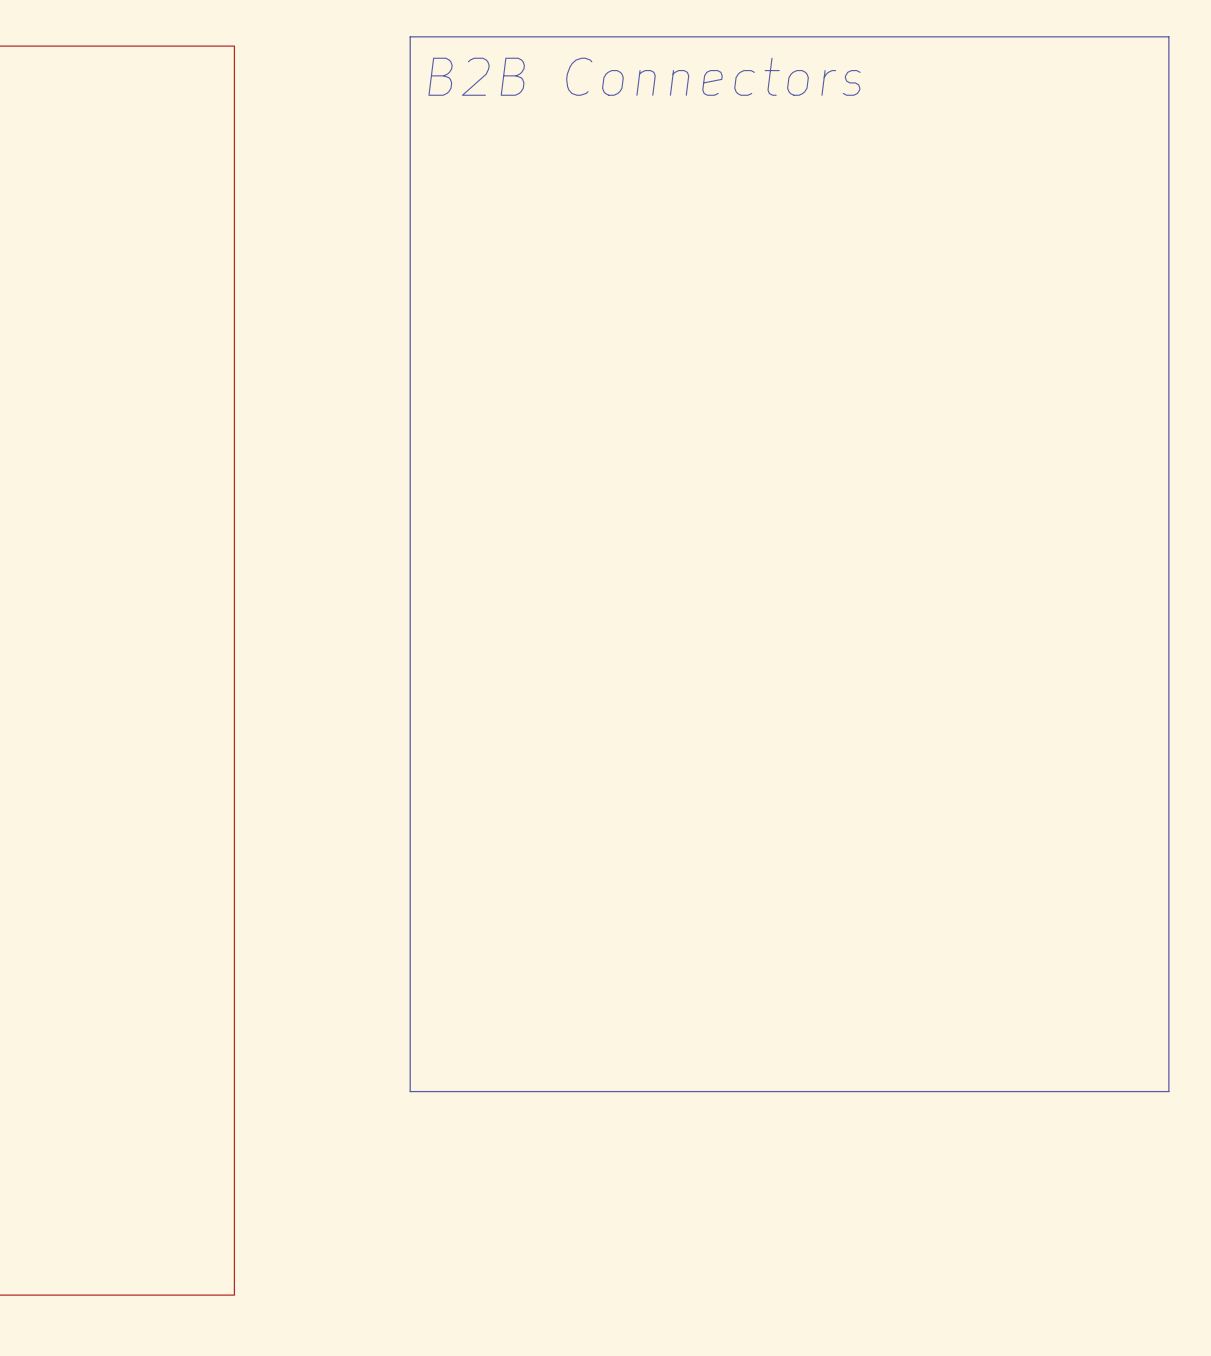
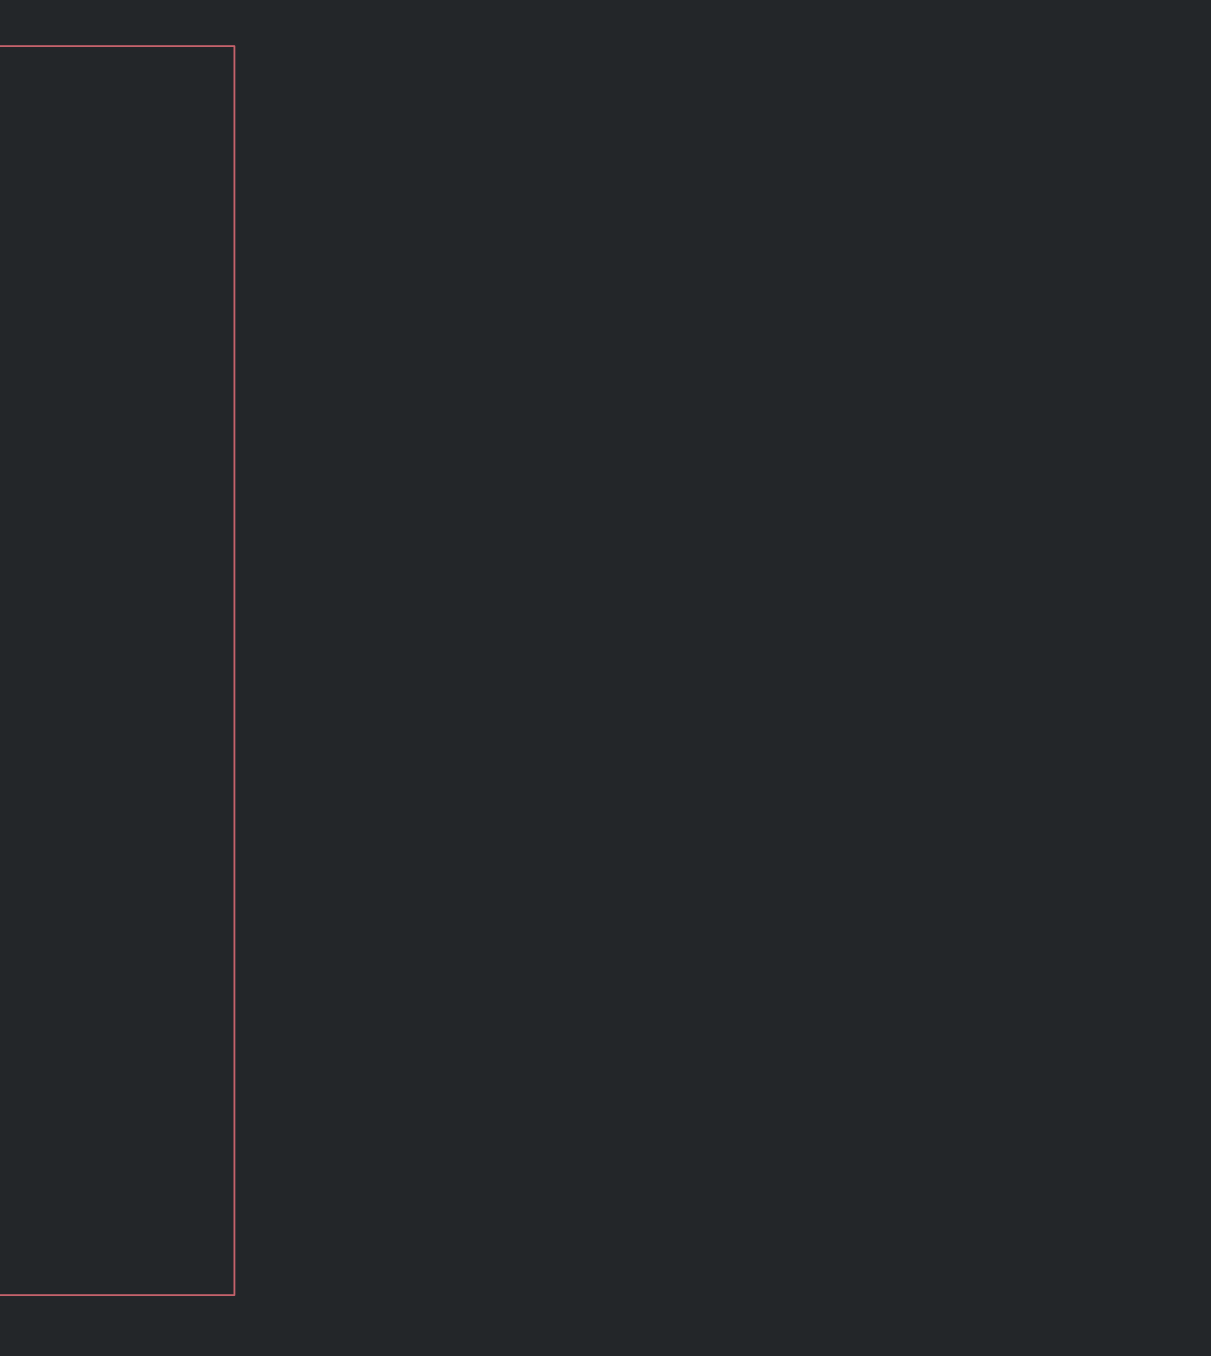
line: (410, 36) (410, 1091) (1168, 1091) (1168, 36) (410, 36) -> none
text: B2B Connectors (644, 76) -> none

